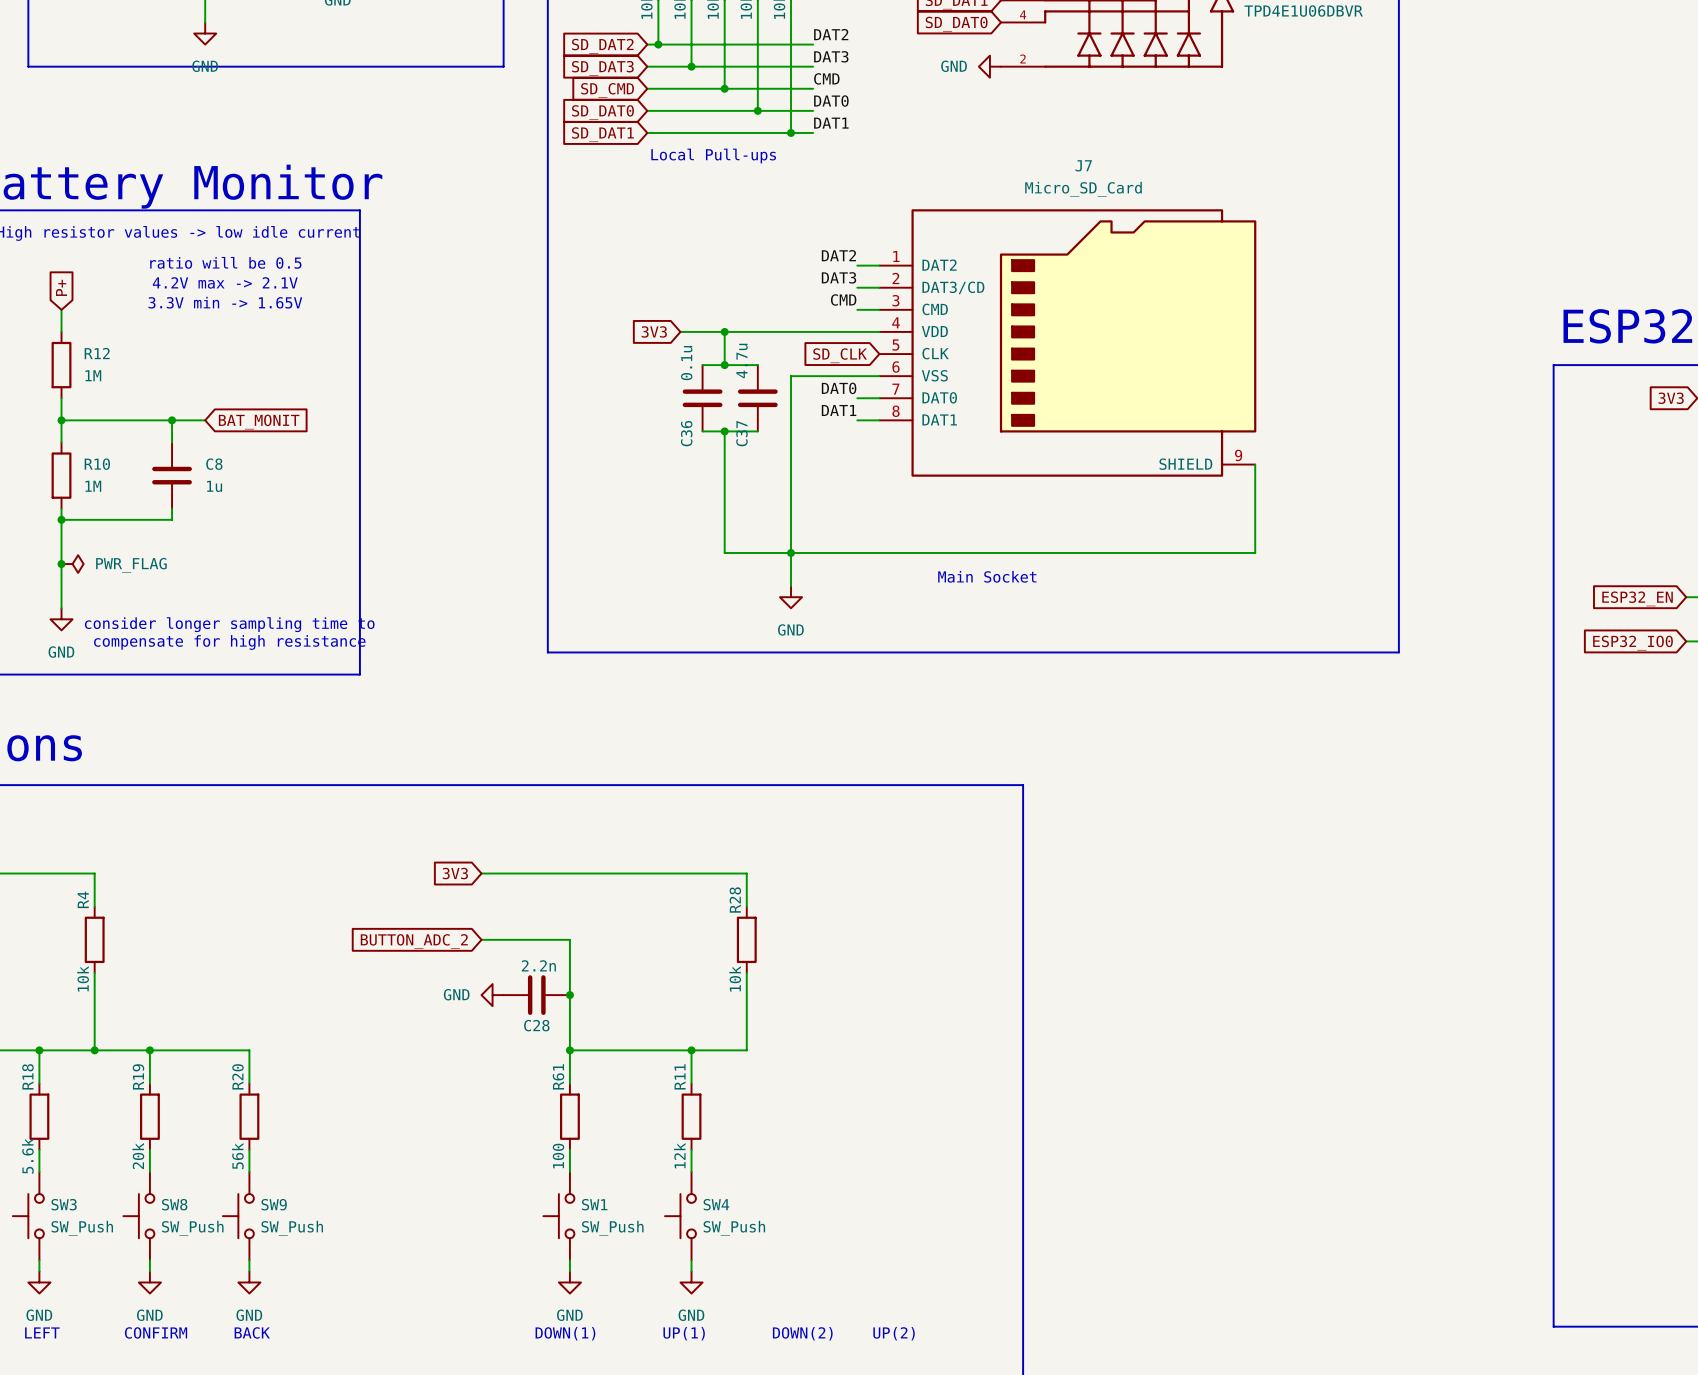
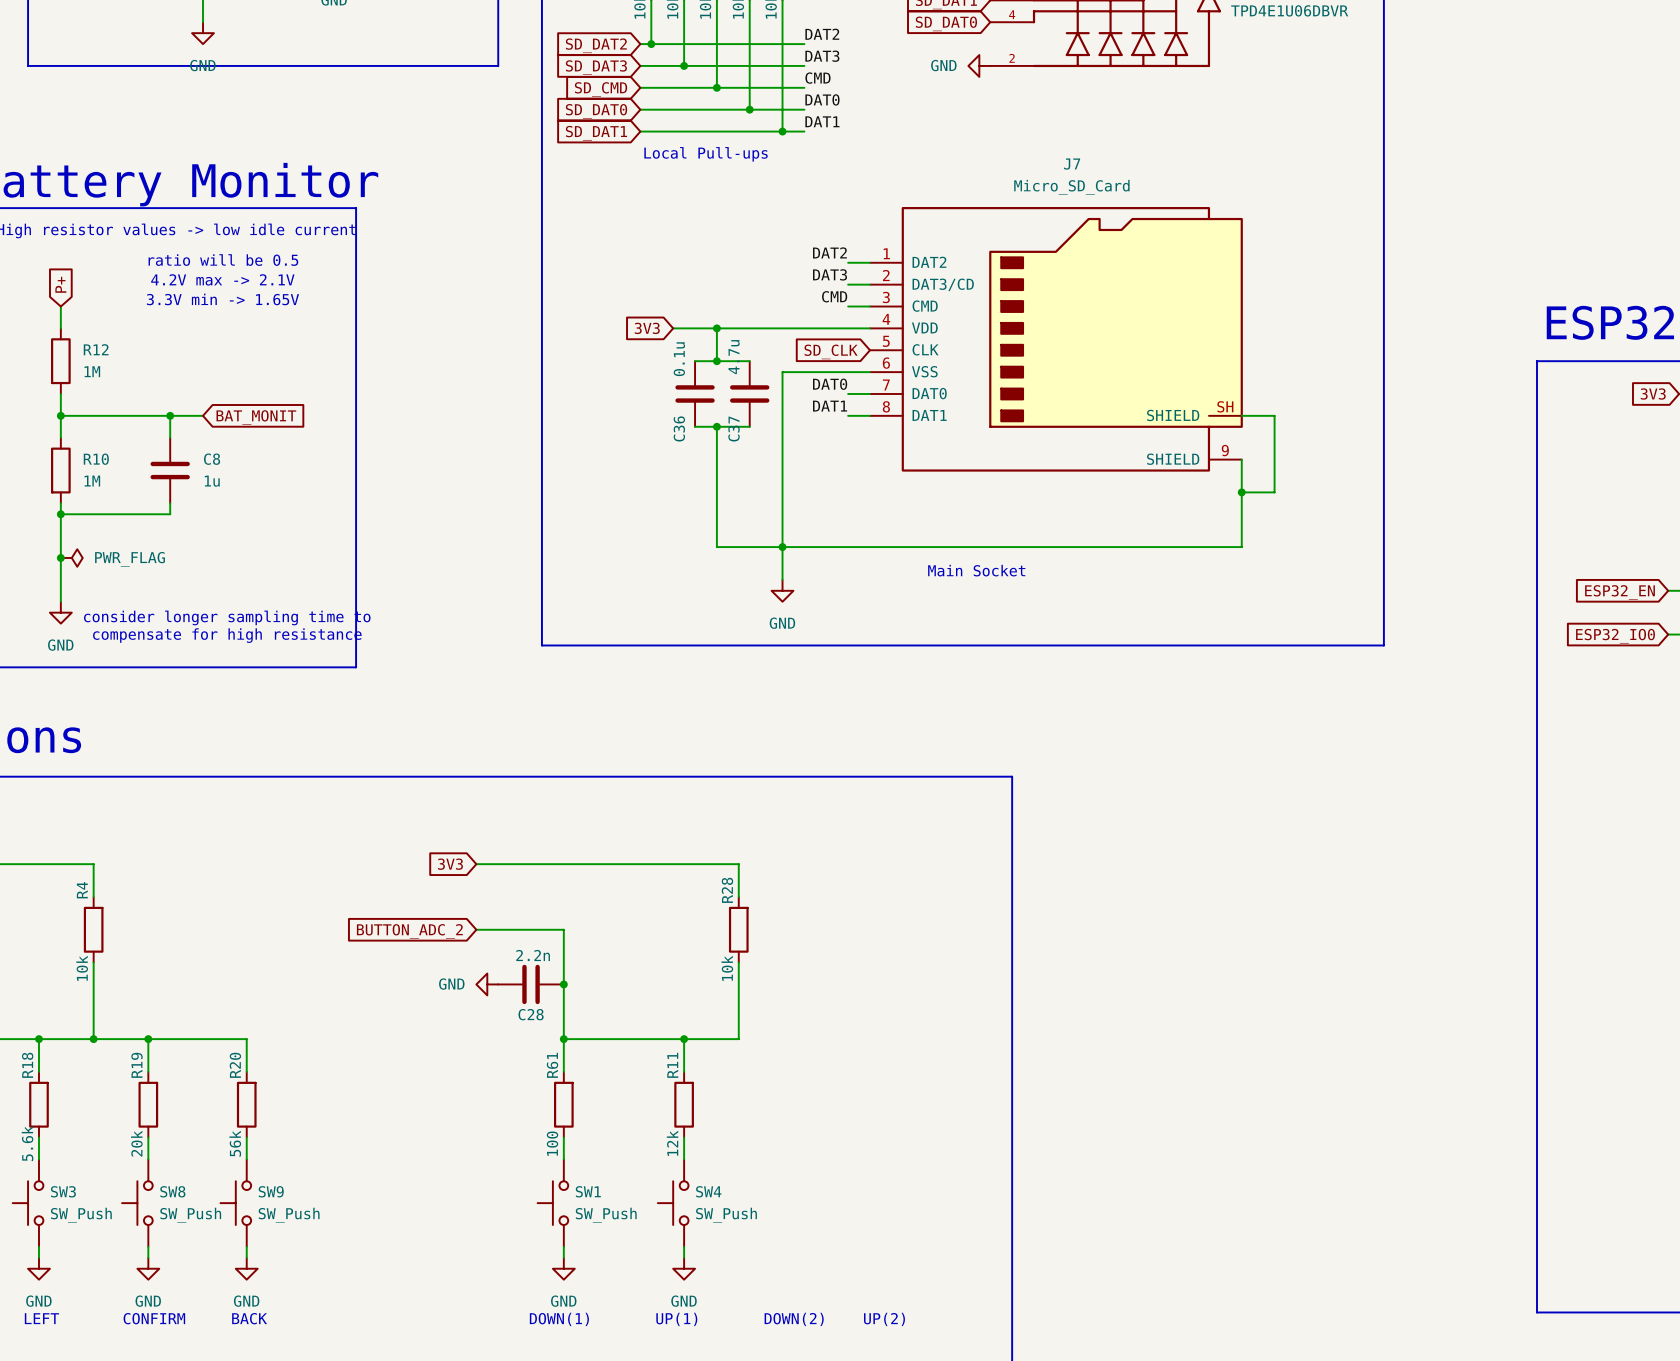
J7 symbol: [879, 209, 1257, 477] -> [870, 207, 1243, 472]
wire: none -> (1241, 415) (1274, 415) (1274, 492) (1241, 492)
junction: none -> (1241, 492)

